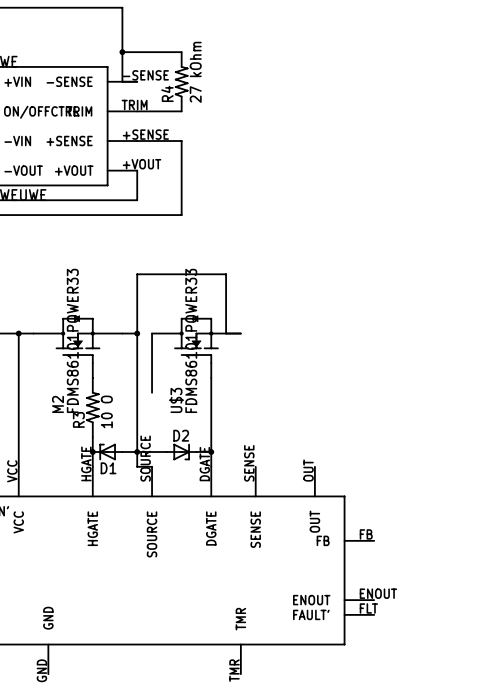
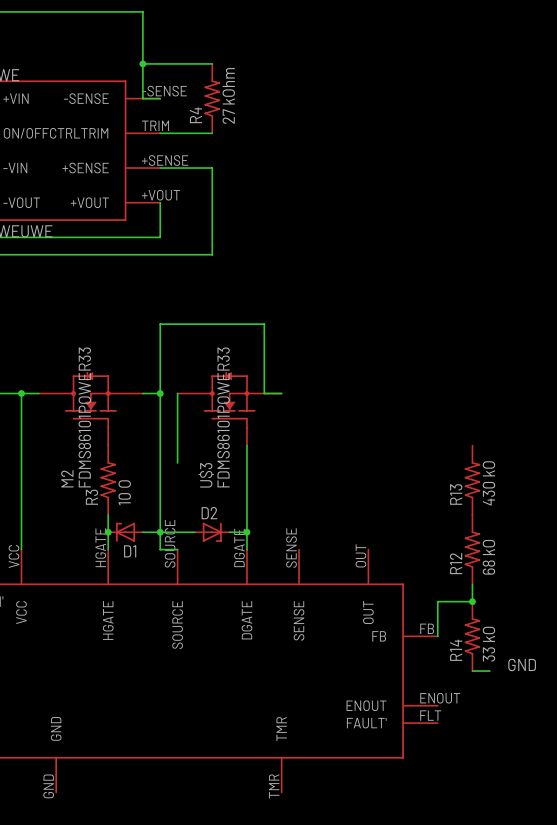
R13: none -> 430 kO (472, 480)
R12: none -> 68 kO (472, 549)
wire: none -> (472, 584) (472, 601) (437, 601) (437, 636)
junction: none -> (472, 601)
R14: none -> 33 kO (472, 636)
label: none -> GND (522, 664)
wire: none -> (472, 671) (489, 671)

